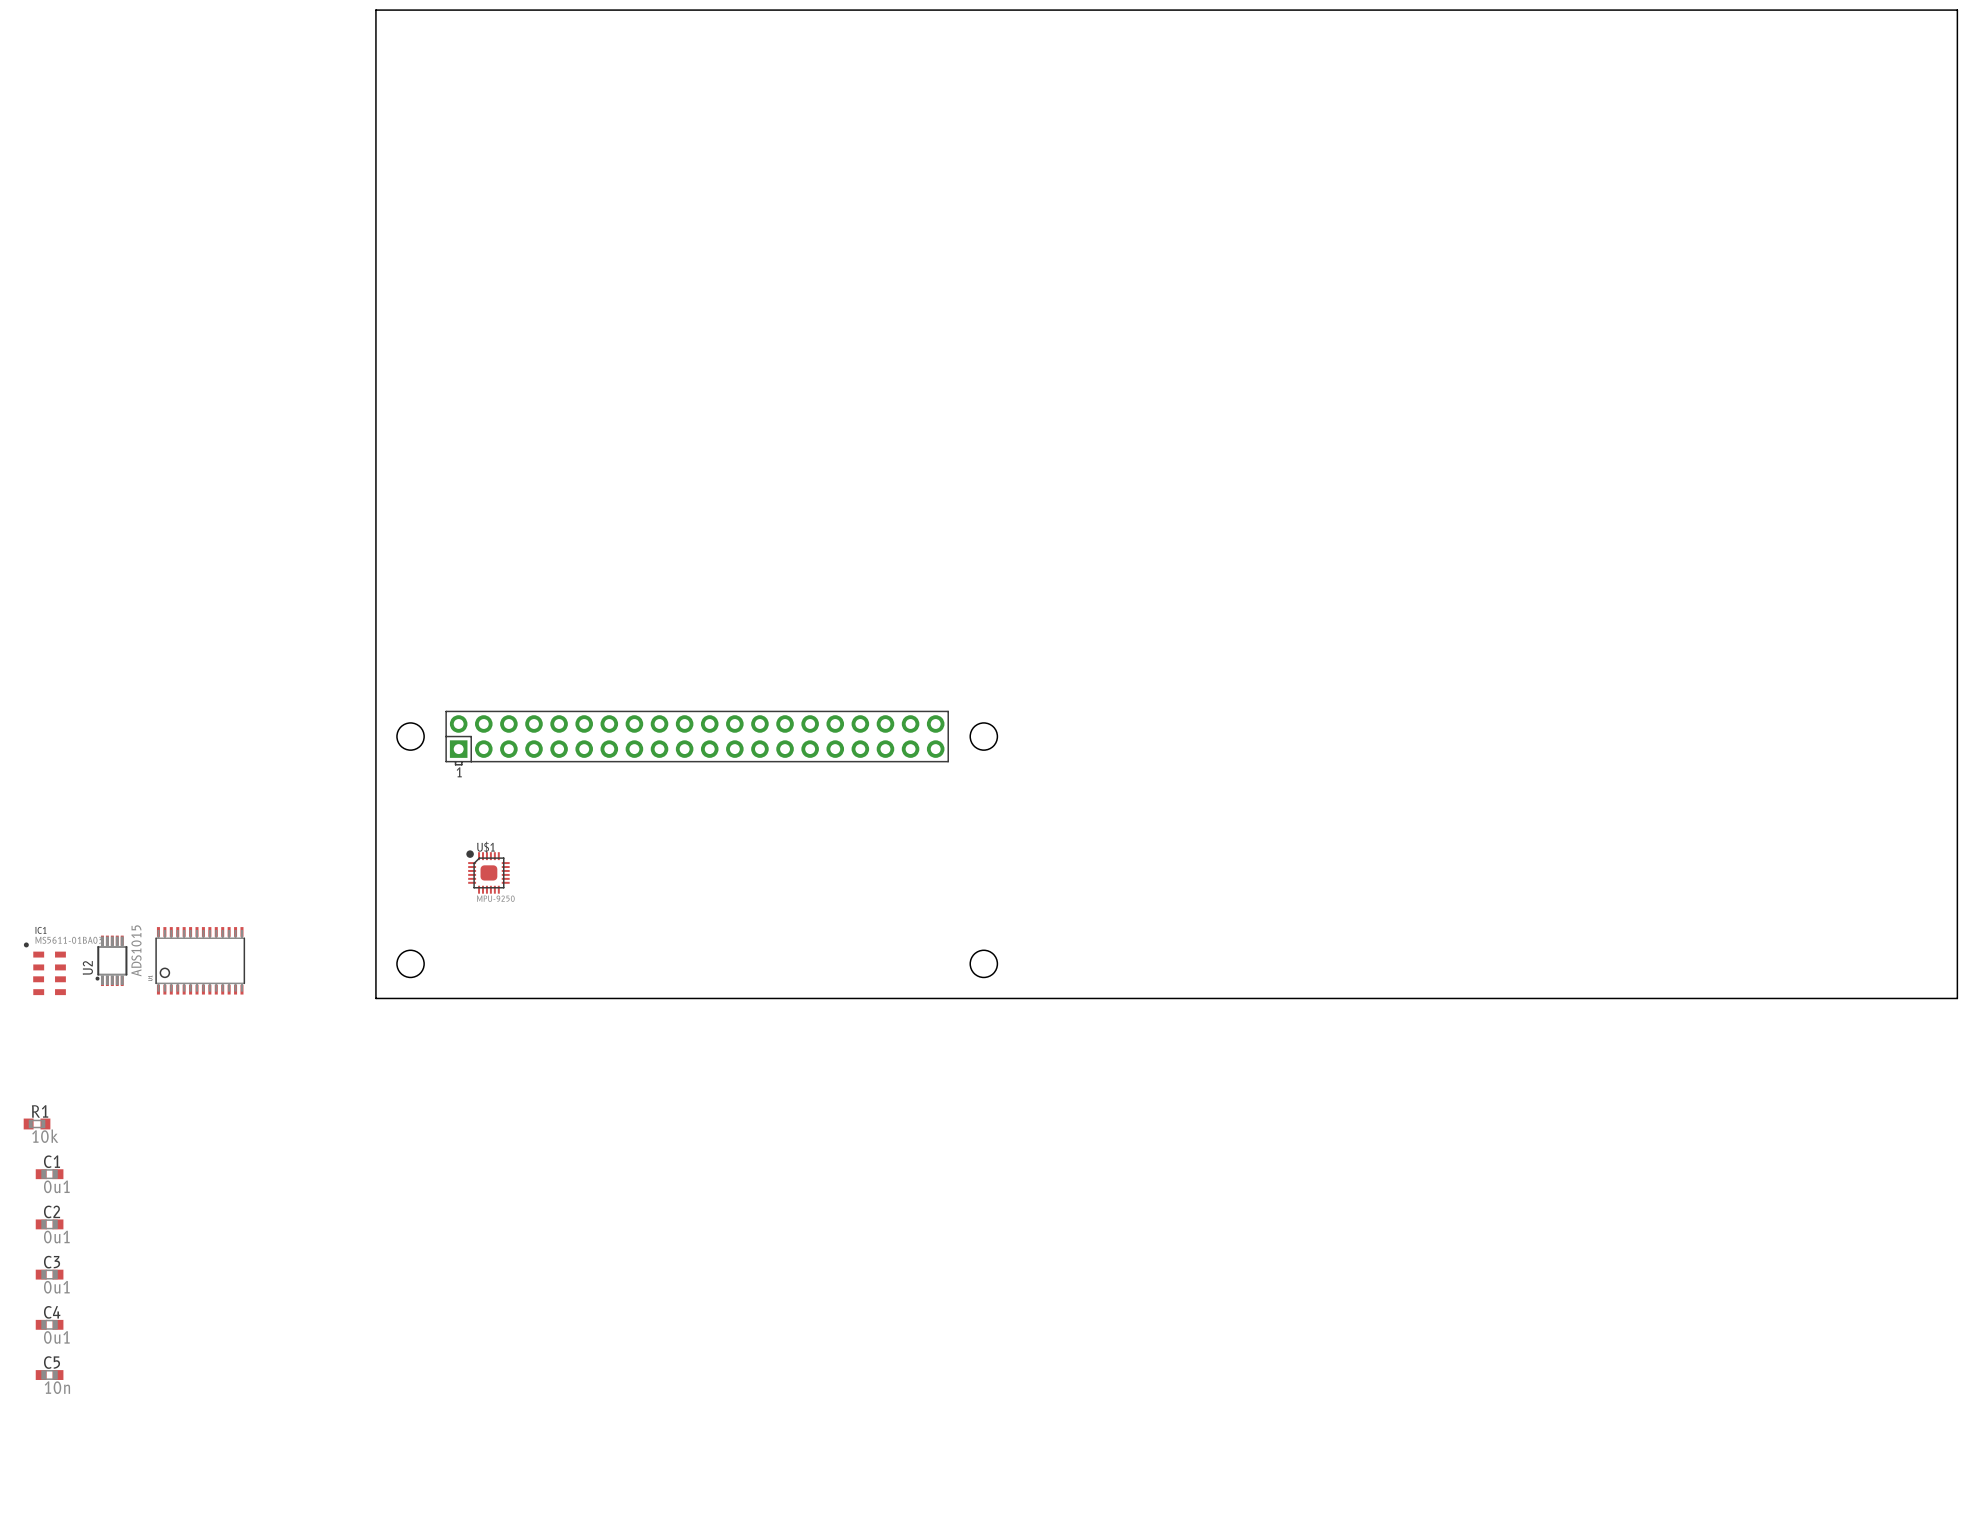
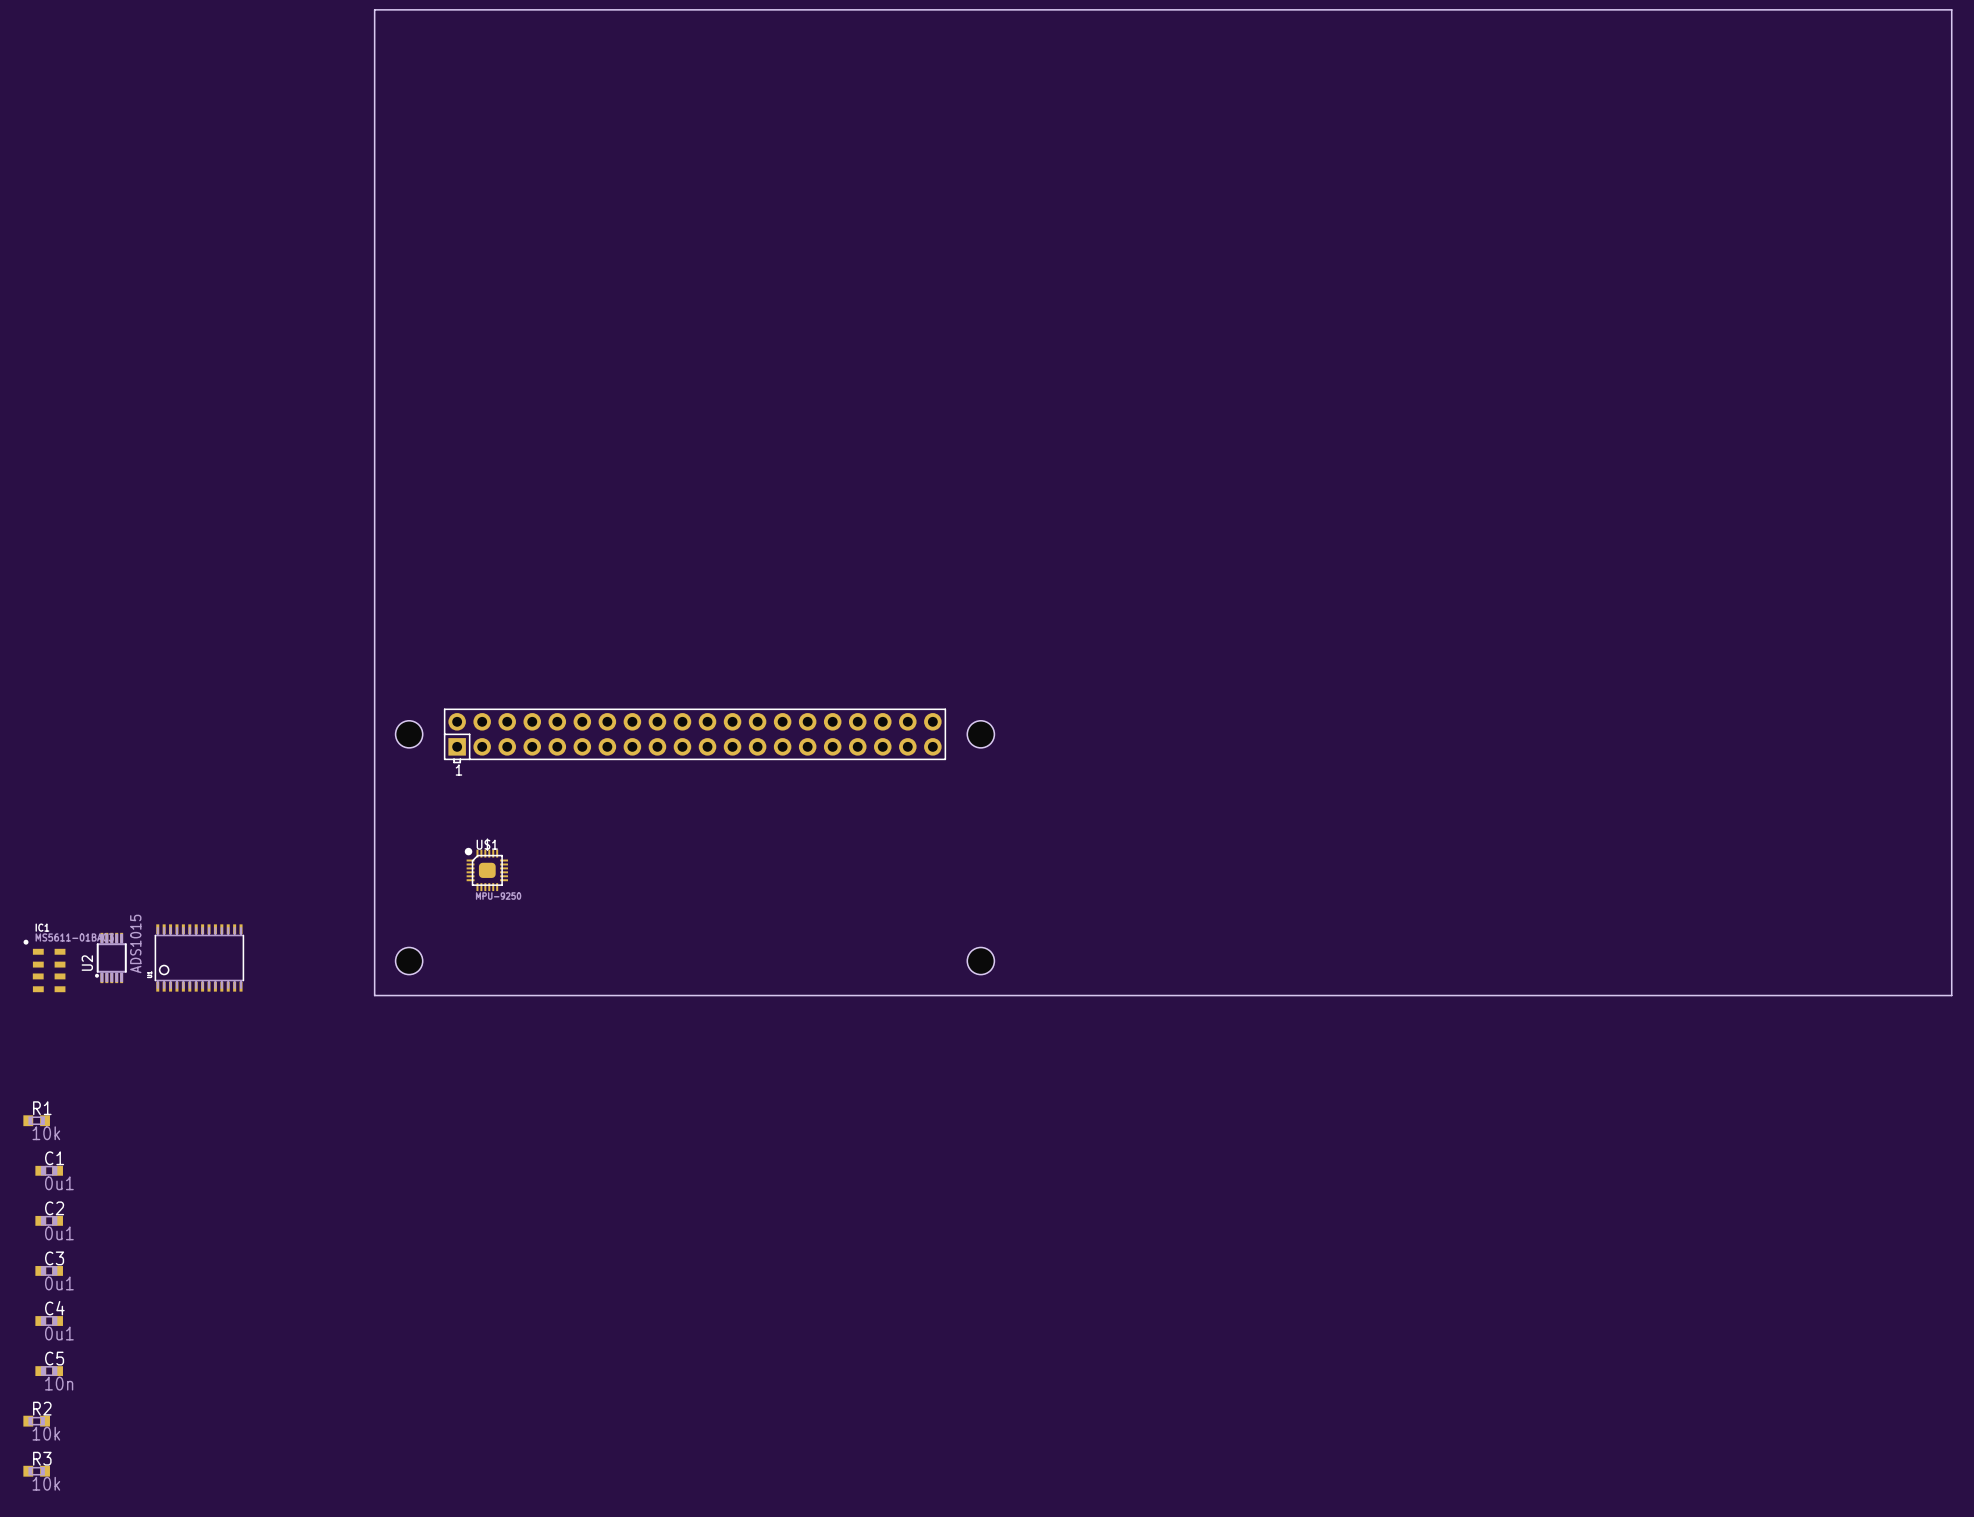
R2: none -> 10k (36, 1421)
R3: none -> 10k (36, 1471)

